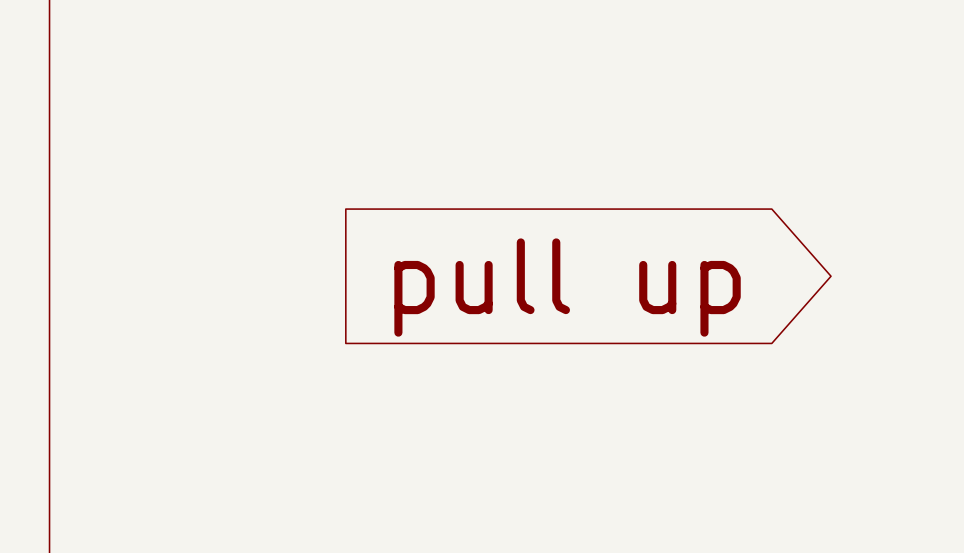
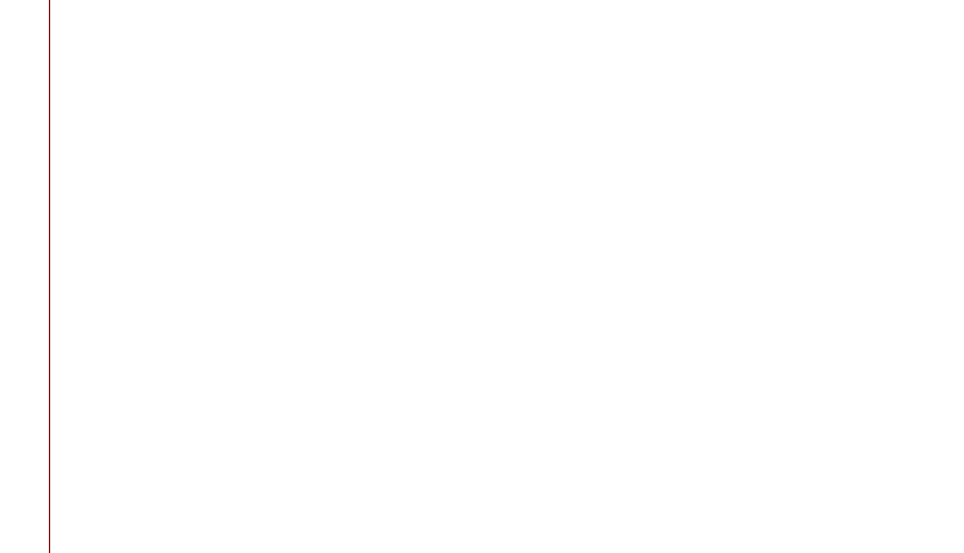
global label: pull up (567, 287) -> none

